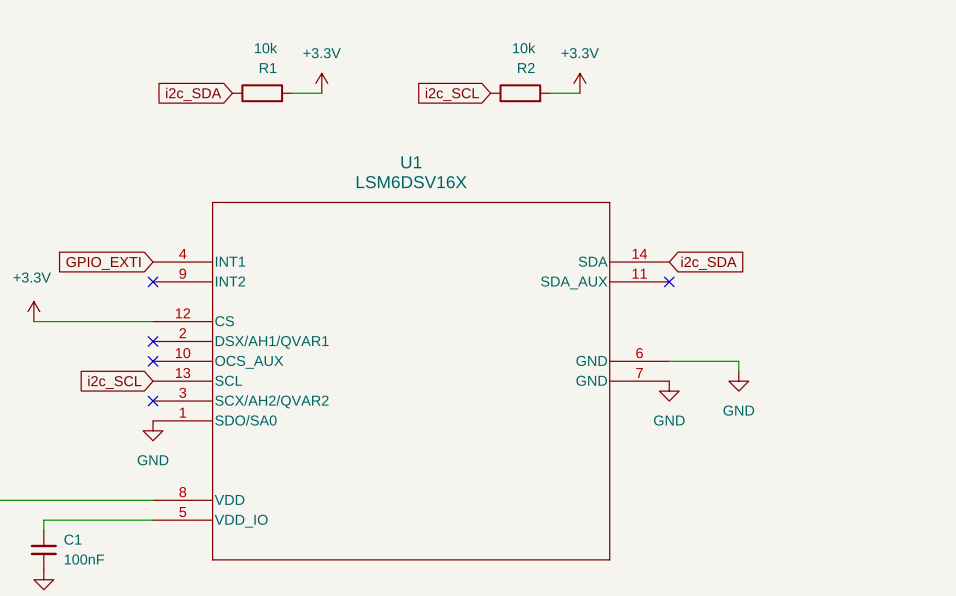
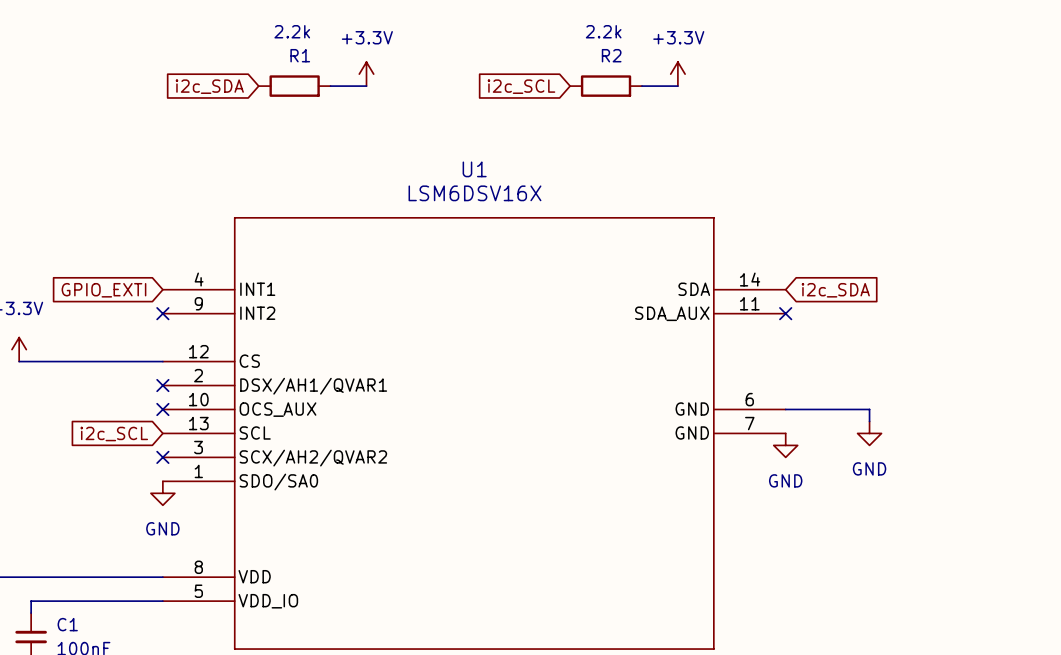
R1 value: 10k (266, 48) -> 2.2k (292, 31)
R2 value: 10k (524, 48) -> 2.2k (603, 31)

